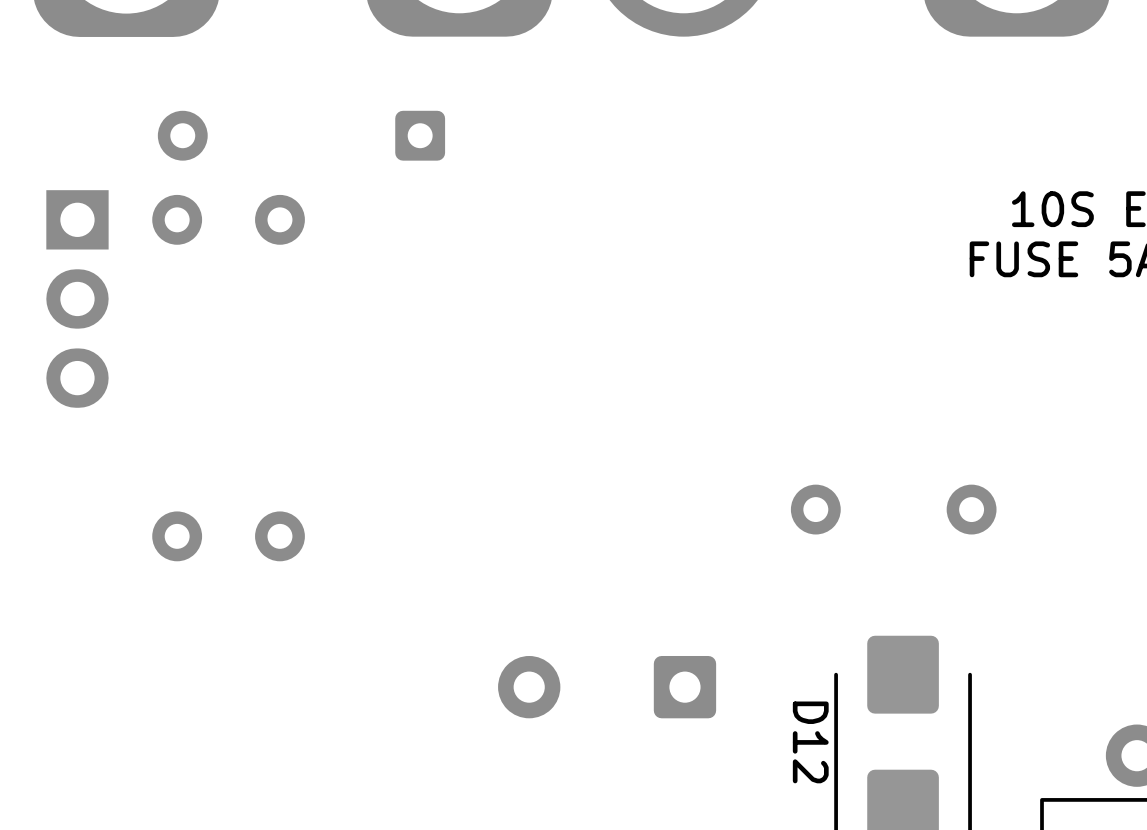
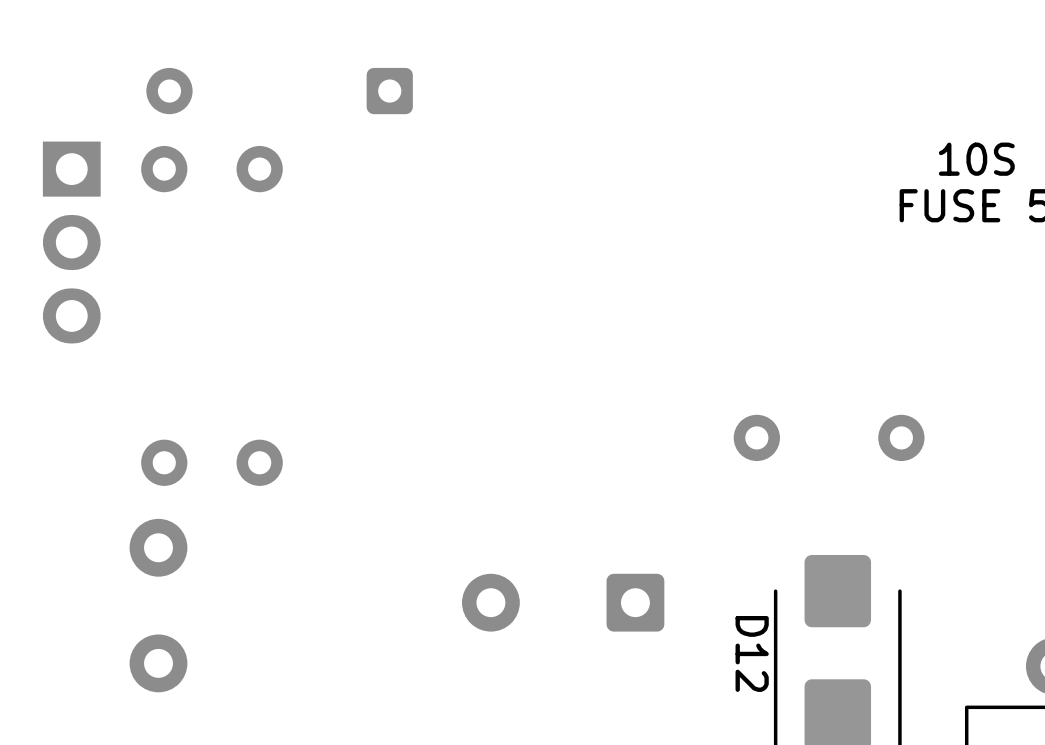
part: none -> (158, 547)
part: none -> (158, 663)

